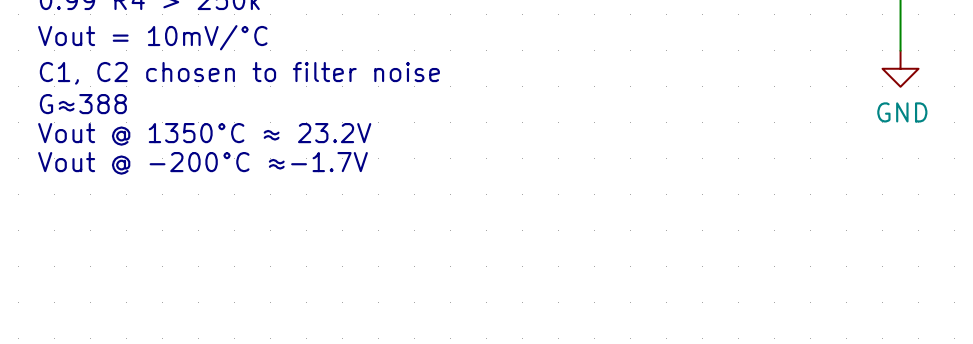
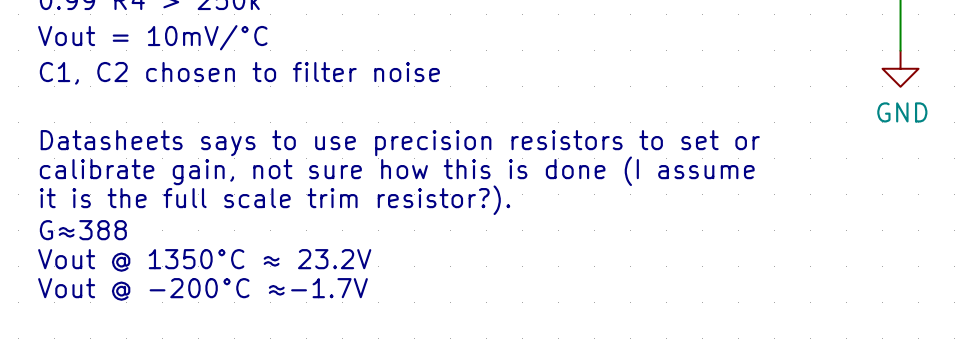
text position: G≈388 (83, 104) -> G≈388 (83, 230)
text position: Vout @ 1350°C ≈ 23.2V (204, 134) -> Vout @ 1350°C ≈ 23.2V (204, 260)
text: none -> Datasheets says to use precision resistors to set or (400, 143)
text position: Vout @ -200°C ≈-1.7V (202, 163) -> Vout @ -200°C ≈-1.7V (202, 289)
text: none -> calibrate gain, not sure how this is done (I assume (397, 171)
text: none -> it is the full scale trim resistor?). (275, 200)

